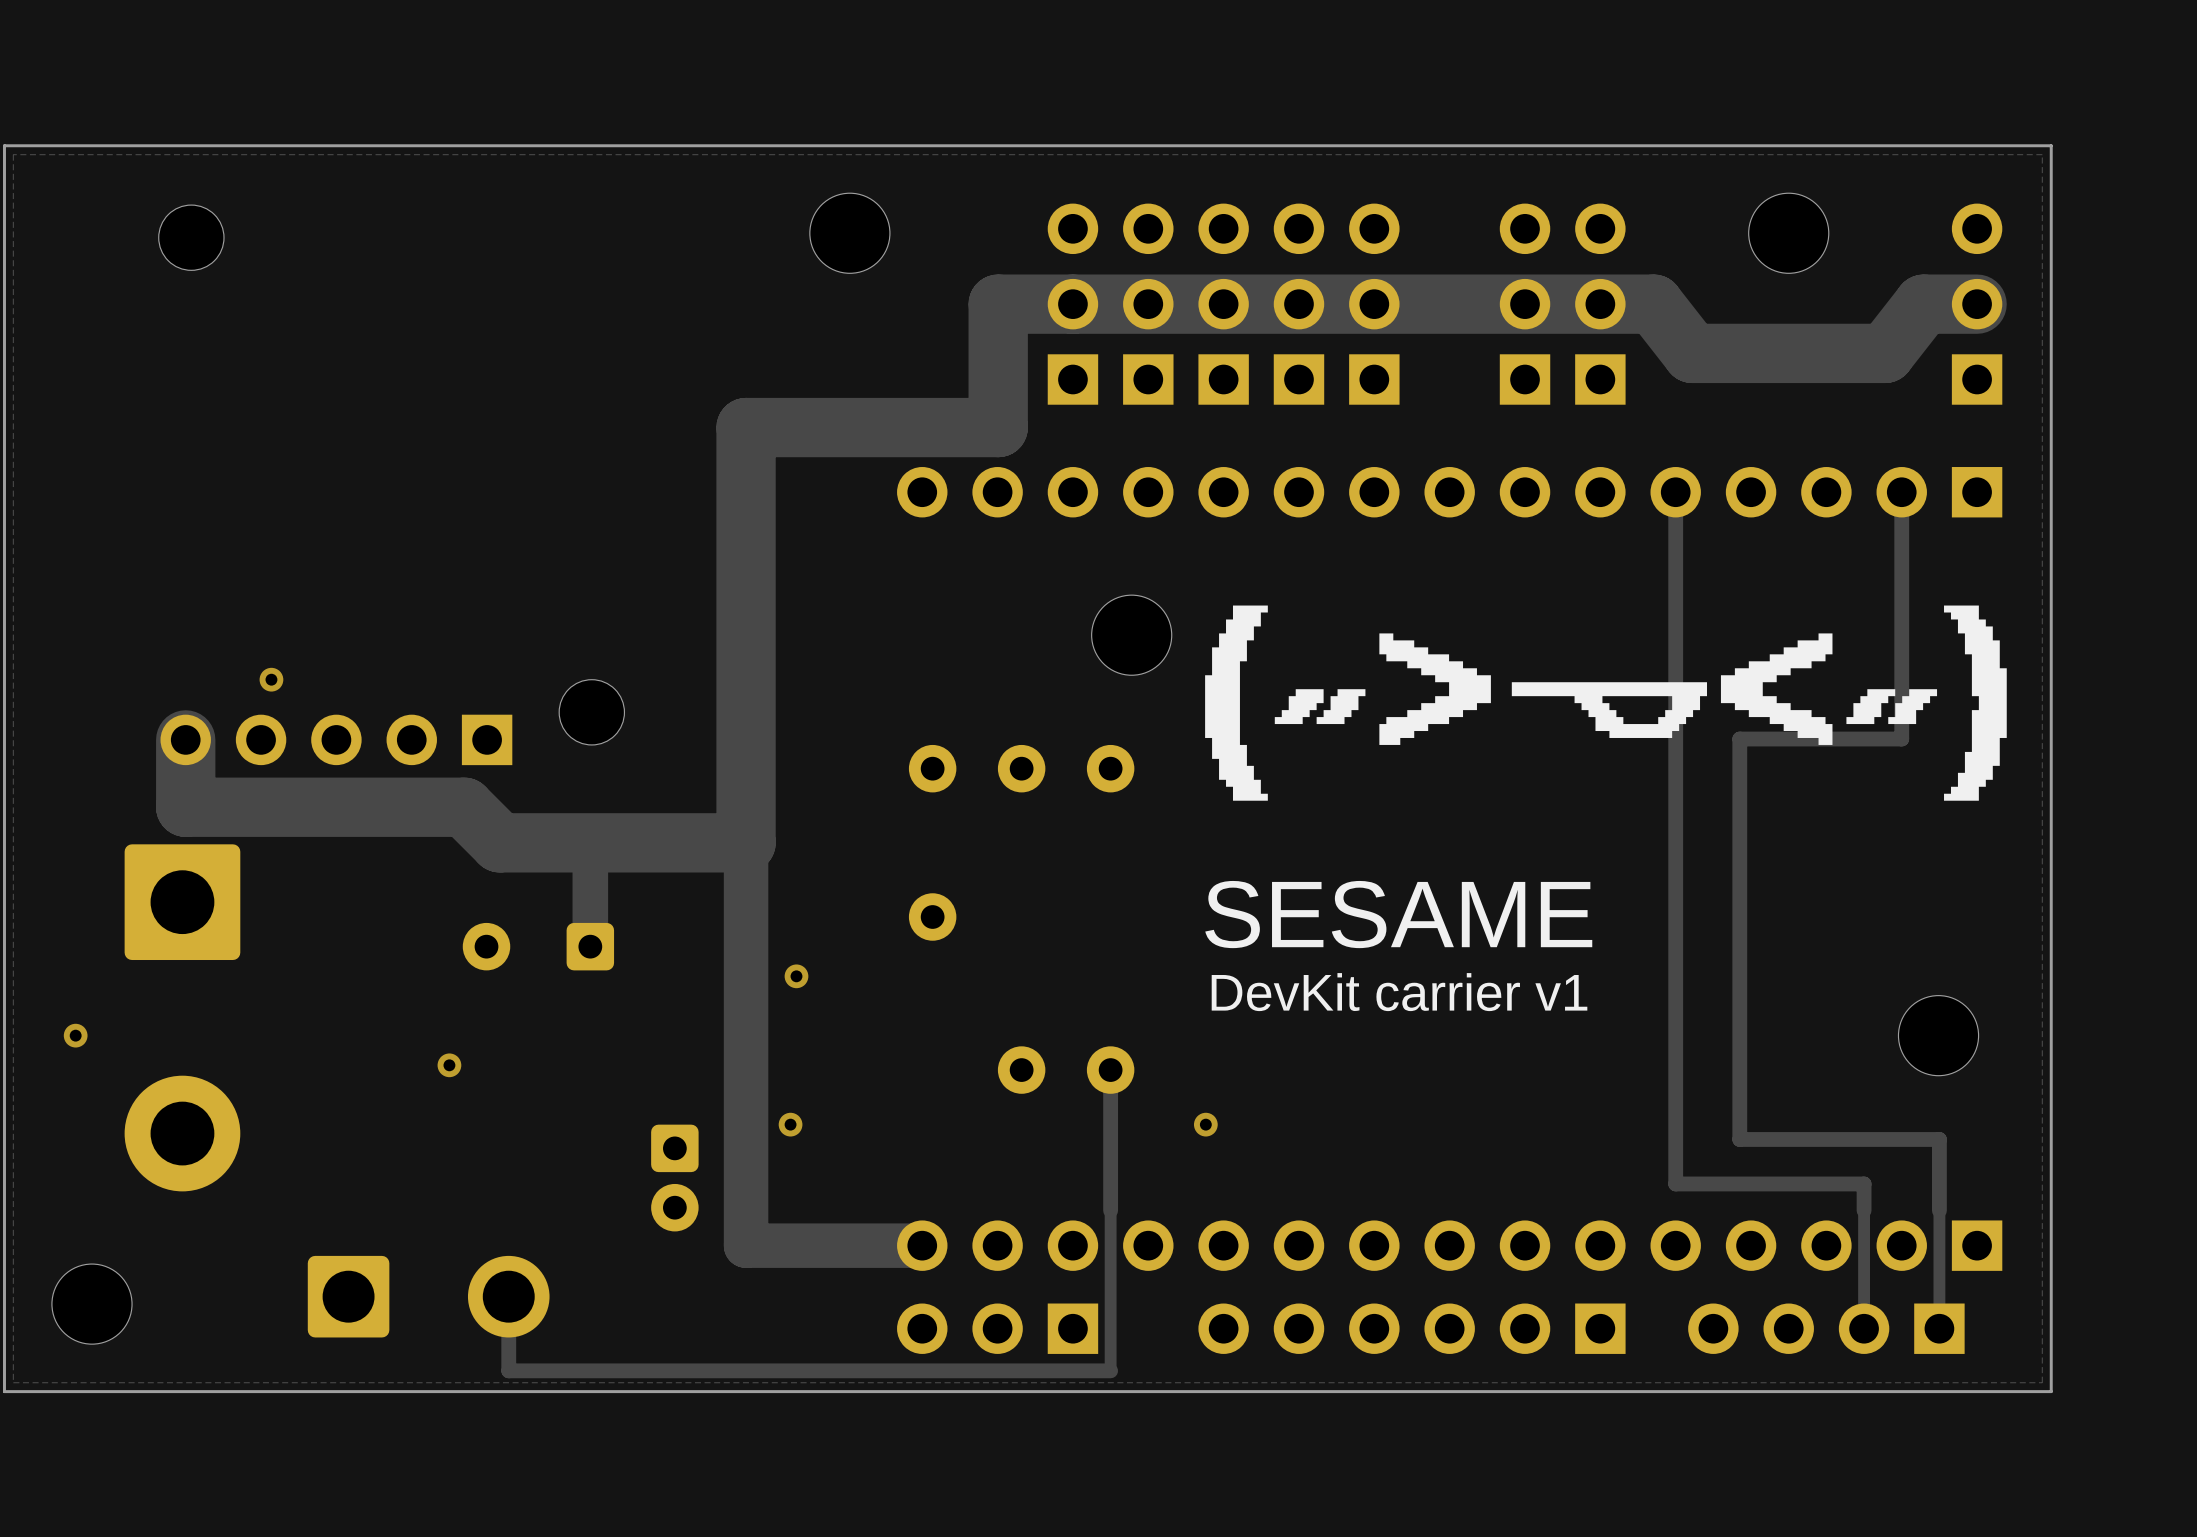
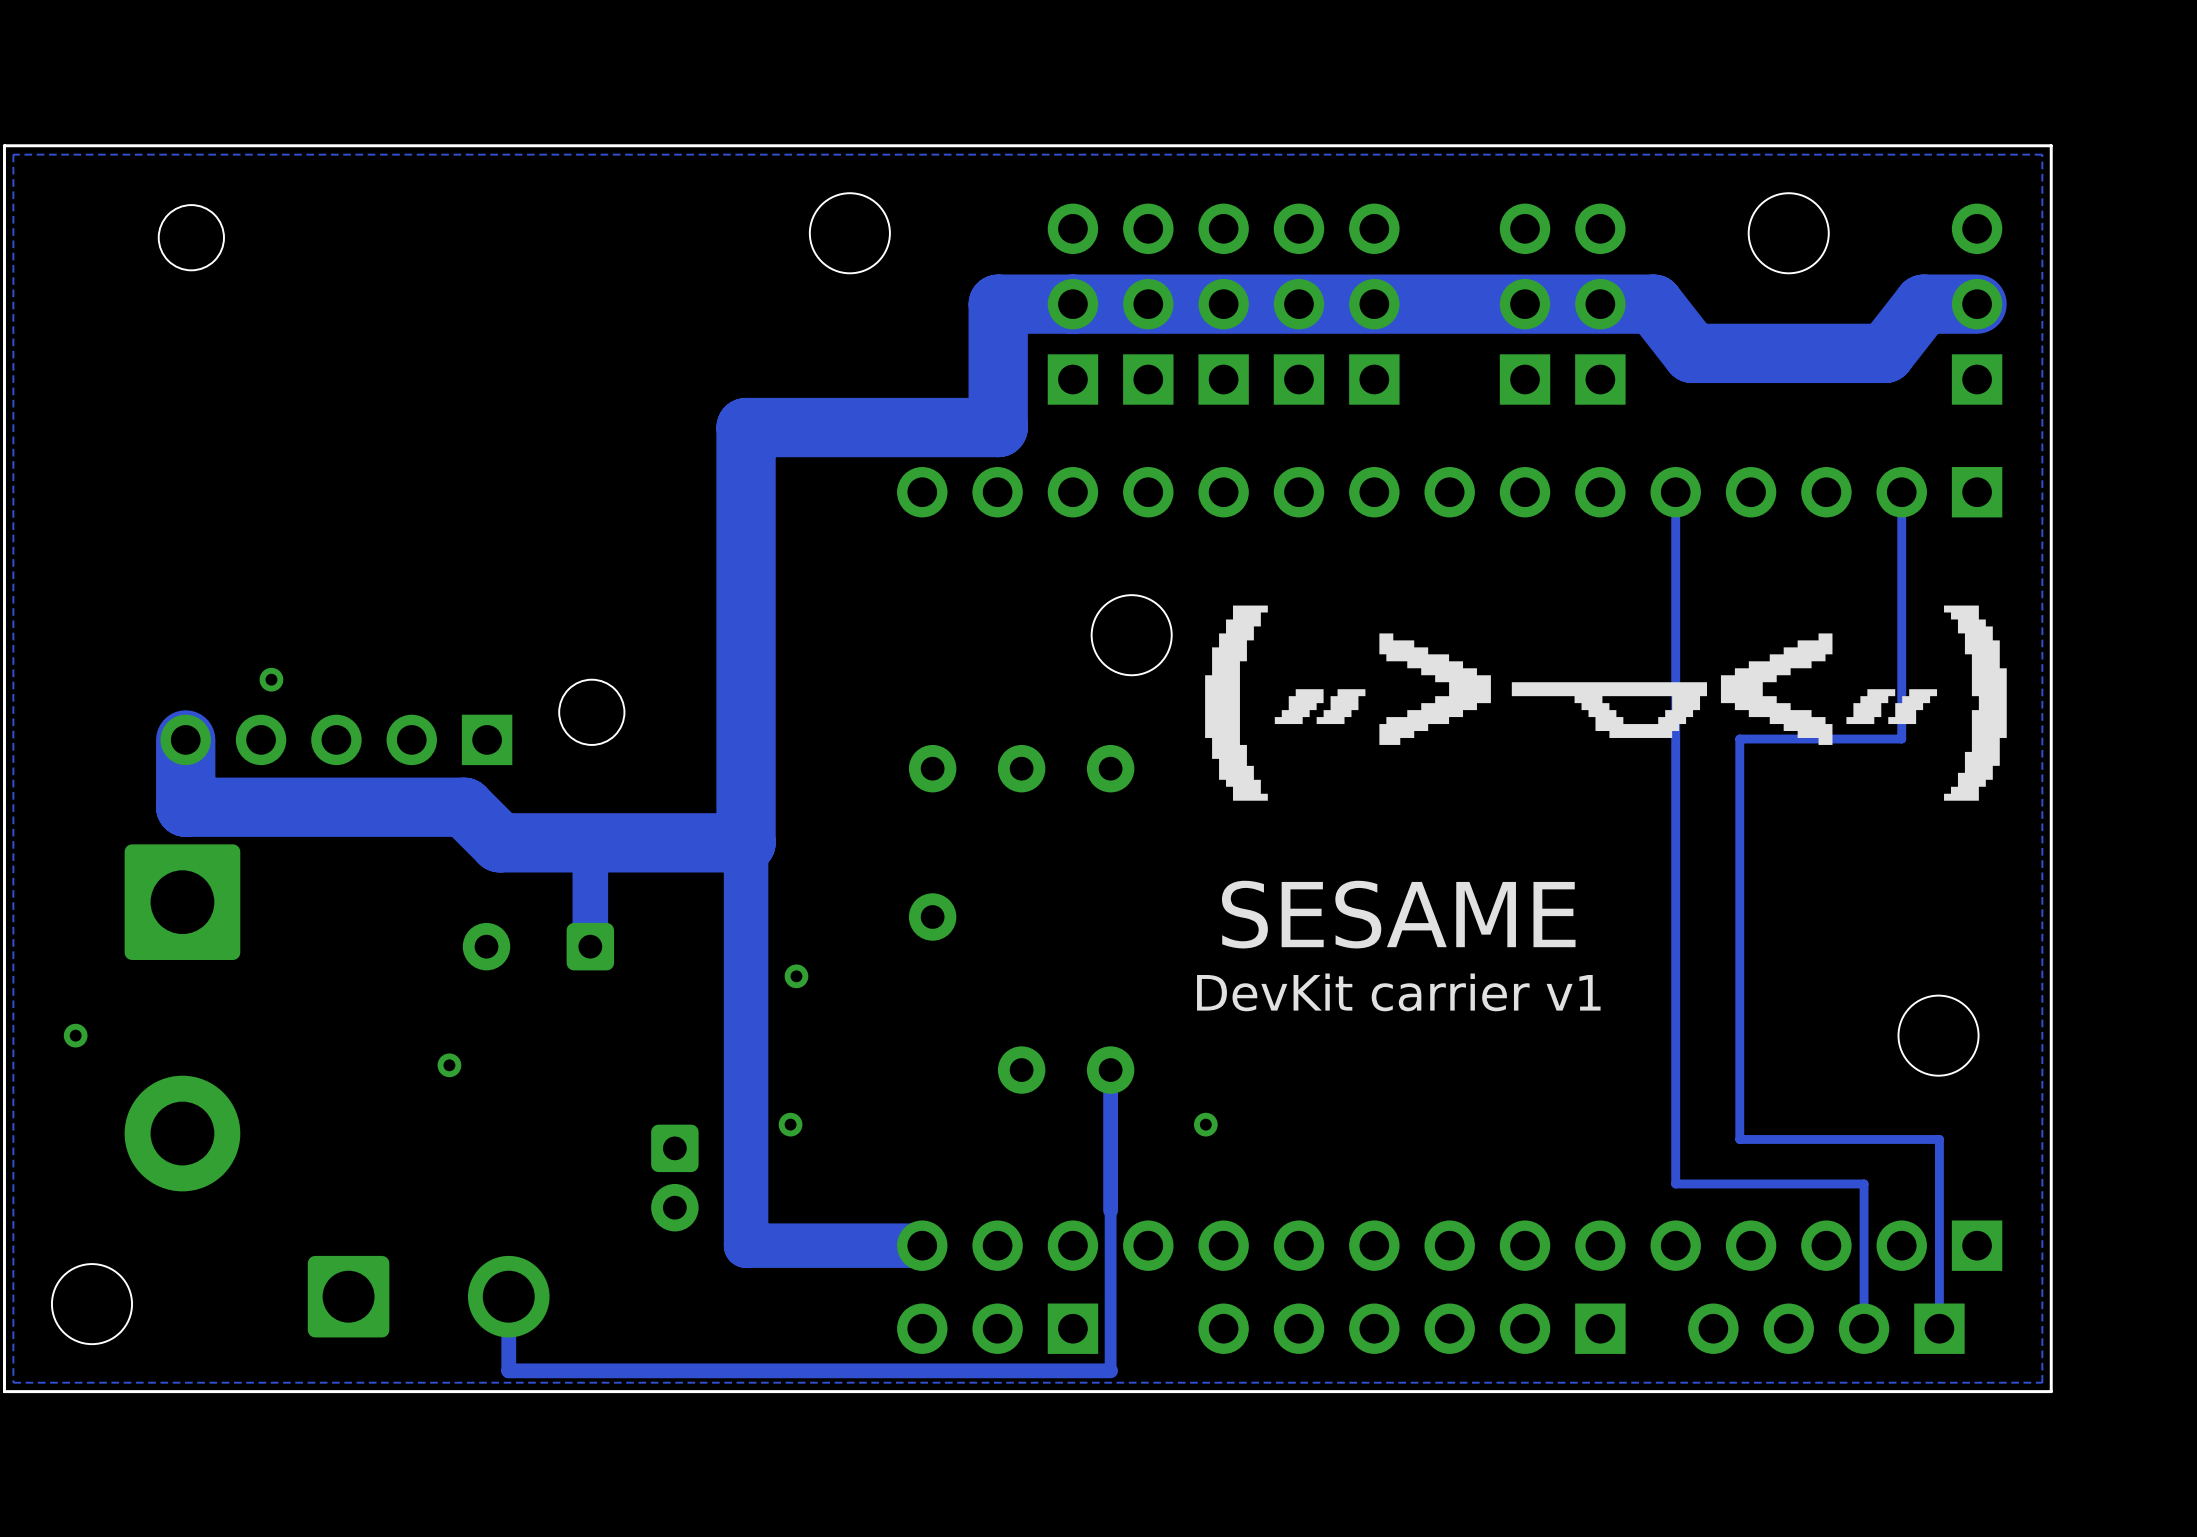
track width: thick (1675, 492) (1675, 1183) (1864, 1183) (1864, 1328) -> thin (1675, 492) (1675, 1183) (1864, 1183) (1864, 1328)
track width: thick (1901, 492) (1901, 739) (1739, 739) (1739, 1139) (1939, 1139) (1939, 1328) -> thin (1901, 492) (1901, 739) (1739, 739) (1739, 1139) (1939, 1139) (1939, 1328)

